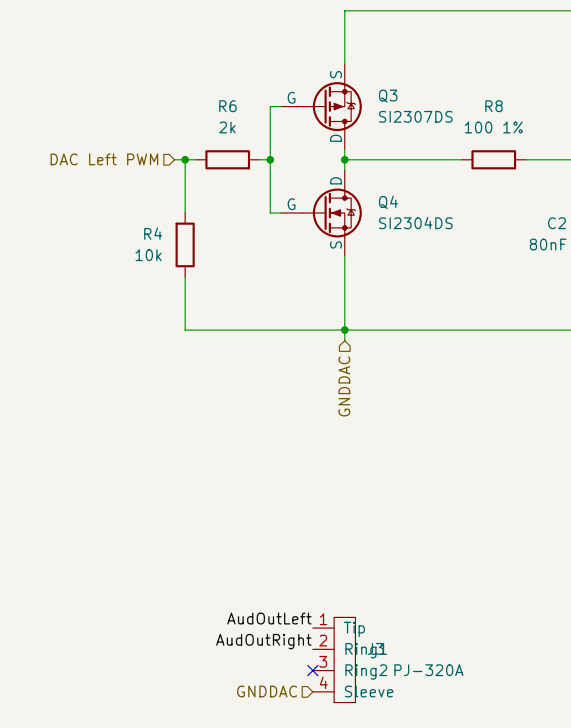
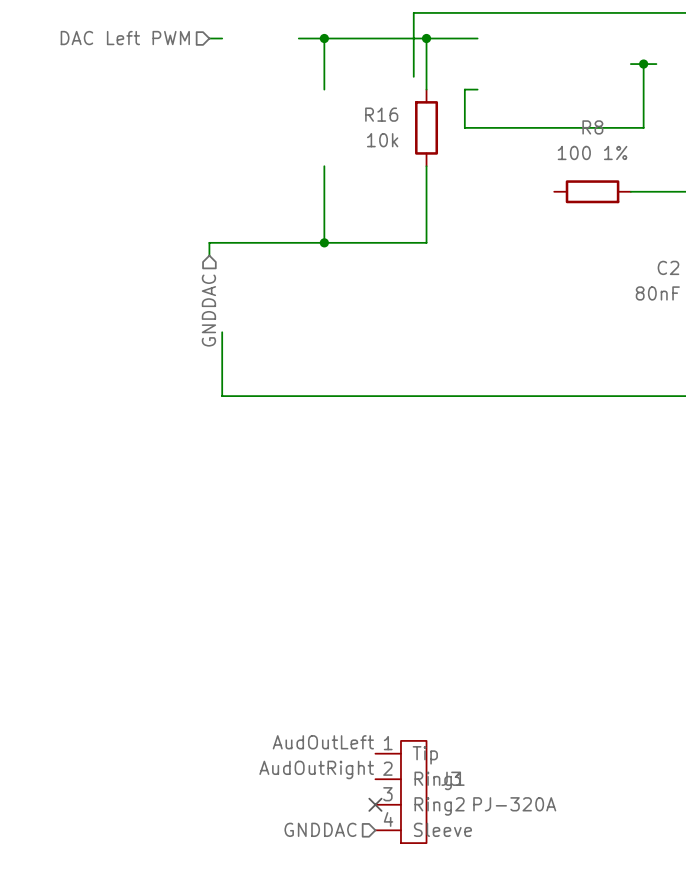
wire: none -> (298, 38) (477, 38)
wire: none -> (324, 38) (324, 89)
junction: none -> (324, 38)
wire: none -> (426, 38) (426, 89)
junction: none -> (426, 38)
wire: none -> (630, 64) (656, 64)
wire: none -> (643, 64) (643, 127) (464, 127) (464, 89) (477, 89)
junction: none -> (643, 64)
wire: (280, 106) (270, 106) (270, 138) -> none
Q3: SI2307DS (321, 106) -> none
R16: none -> 10k (426, 127)
wire: none -> (426, 166) (426, 242) (209, 242) (209, 255)
wire: (344, 149) (344, 170) -> none
hierarchical label position: DAC Left PWM (104, 159) -> DAC Left PWM (125, 38)
wire: (174, 159) (195, 159) -> none
wire: (185, 159) (185, 213) -> none
junction: (185, 159) -> none
R6: 2k (227, 159) -> none
wire: (259, 159) (270, 159) -> (209, 38) (222, 38)
junction position: (270, 159) -> (324, 242)
wire: (344, 159) (461, 159) -> none
junction: (344, 159) -> none
wire: (270, 202) (270, 213) (280, 213) -> none
Q4: SI2304DS (321, 213) -> none
R4: 10k (185, 244) -> none
wire: (344, 255) (344, 340) -> none
hierarchical label: none -> GNDDAC (208, 310)
junction: (344, 330) -> none
hierarchical label: GNDDAC (344, 386) -> none

